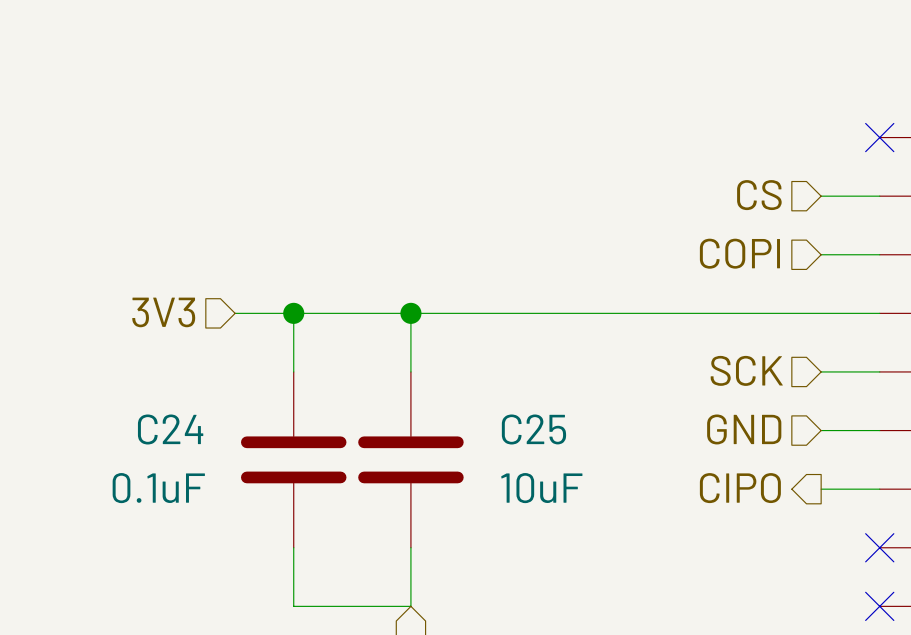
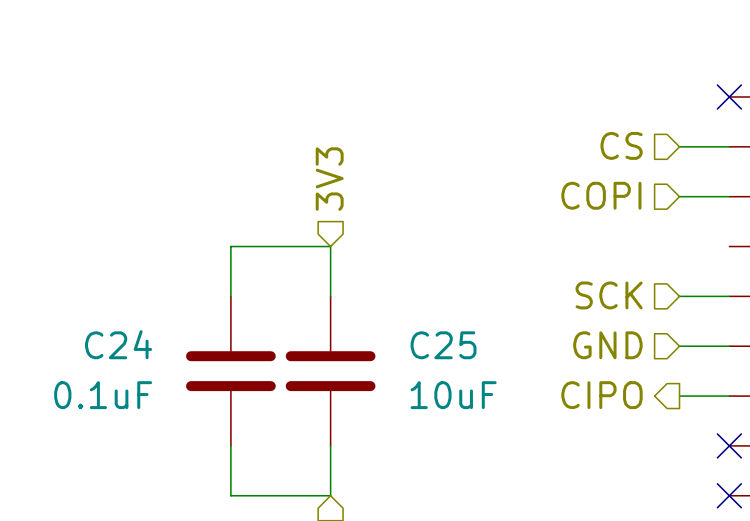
hierarchical label rotation: 0° (163, 312) -> 90° clockwise (329, 179)
hierarchical label position: 3V3 (163, 312) -> 3V3 (329, 179)
wire: (235, 313) (293, 313) -> none
junction: (293, 313) -> none
wire: (410, 313) (879, 313) -> none
junction: (410, 313) -> none

